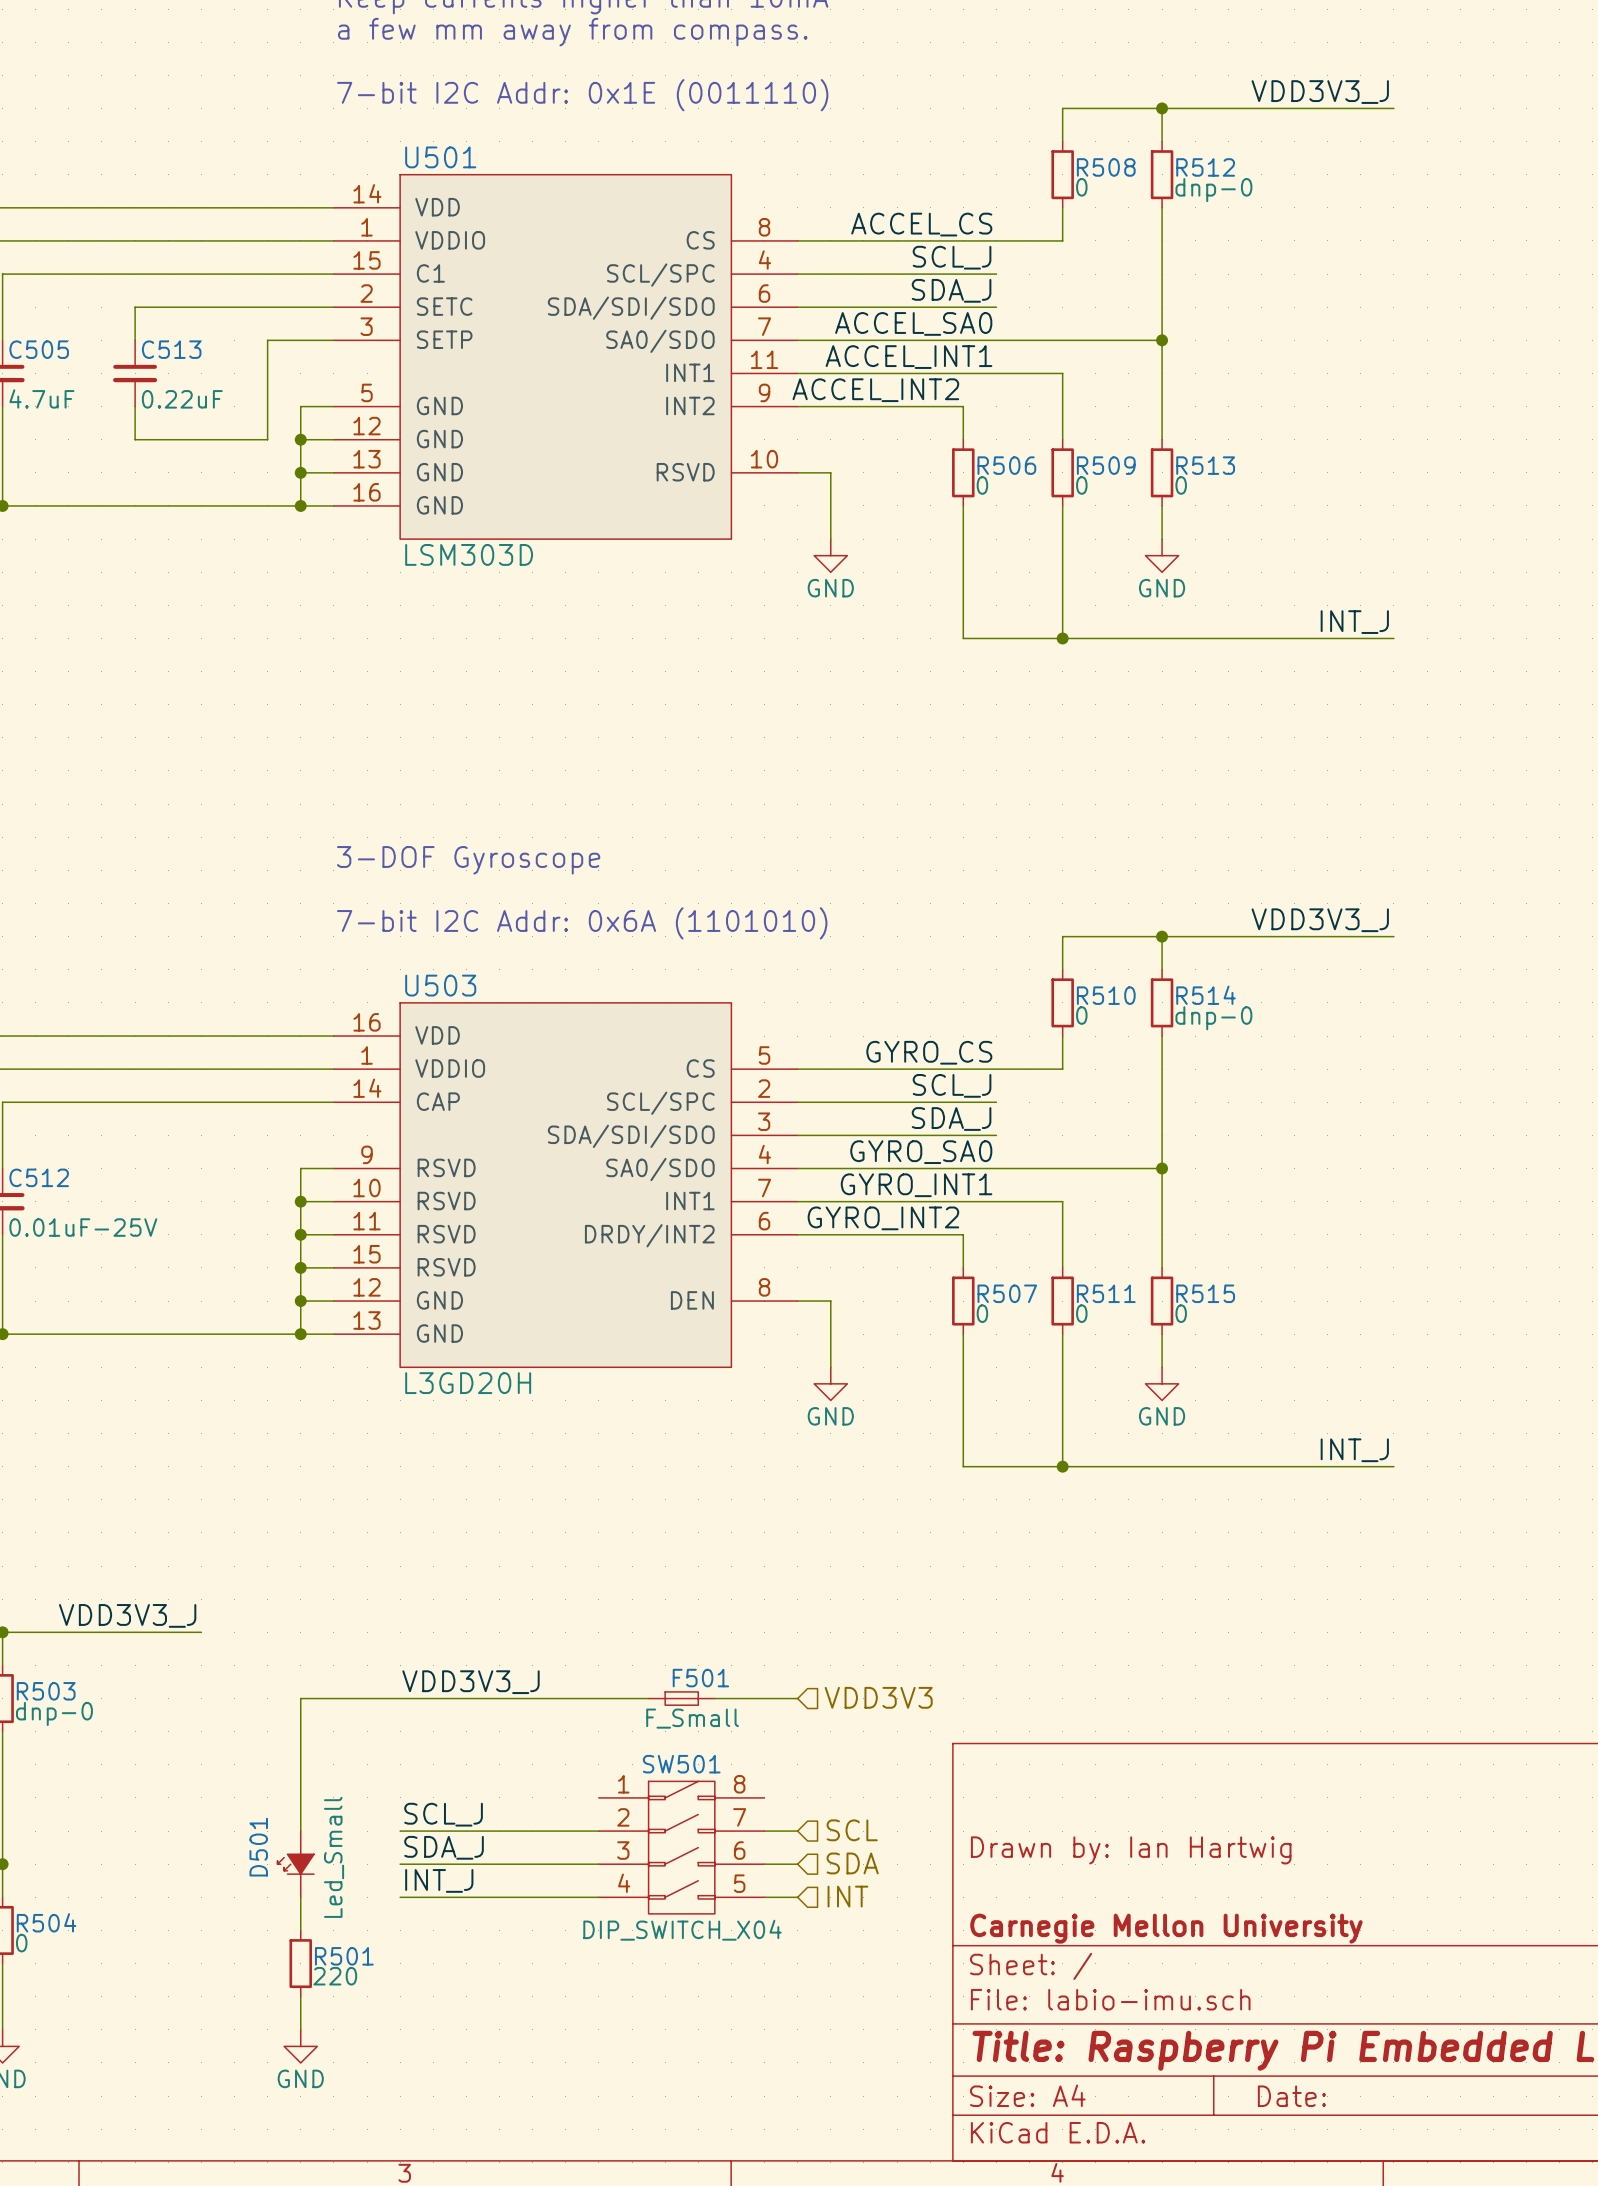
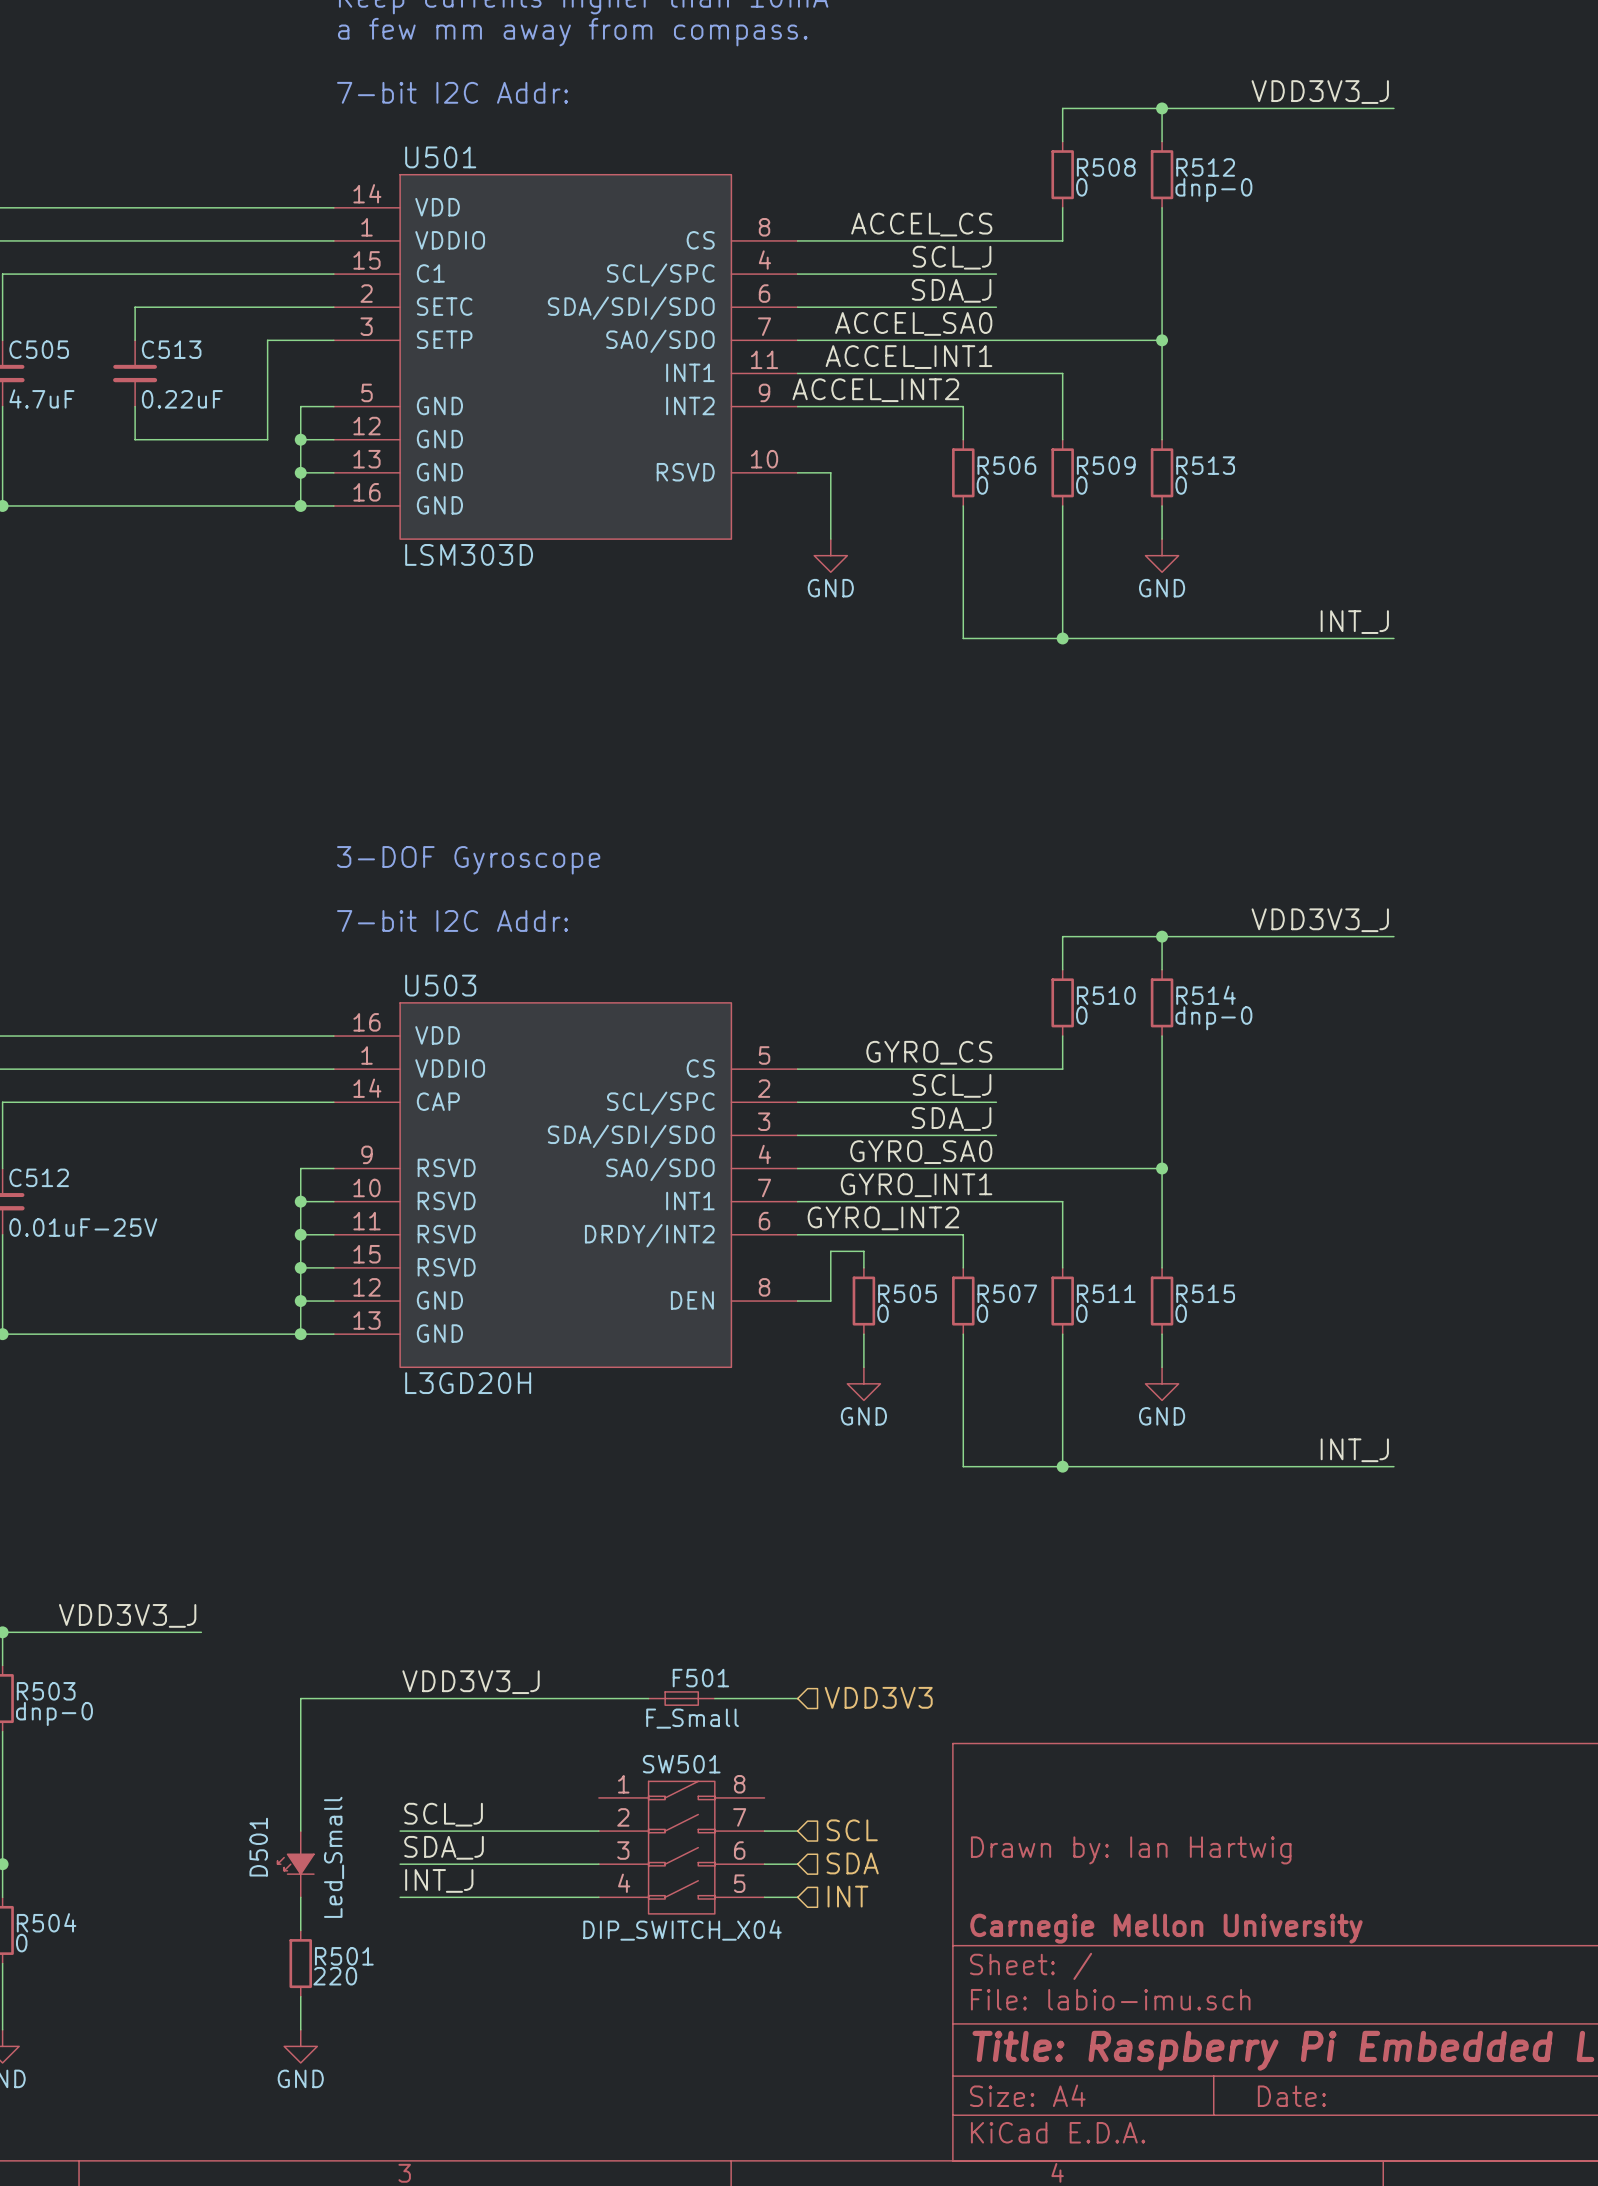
text: 7-bit I2C Addr: 0x1E (0011110) (582, 95) -> 7-bit I2C Addr: (452, 92)
text: 7-bit I2C Addr: 0x6A (1101010) (582, 923) -> 7-bit I2C Addr: (452, 921)
wire: (830, 1301) (830, 1367) -> (830, 1301) (830, 1251) (863, 1251) (863, 1267)
R505: none -> 0 (863, 1301)
wire: none -> (863, 1334) (863, 1367)
power symbol position: GND (830, 1383) -> GND (863, 1383)

